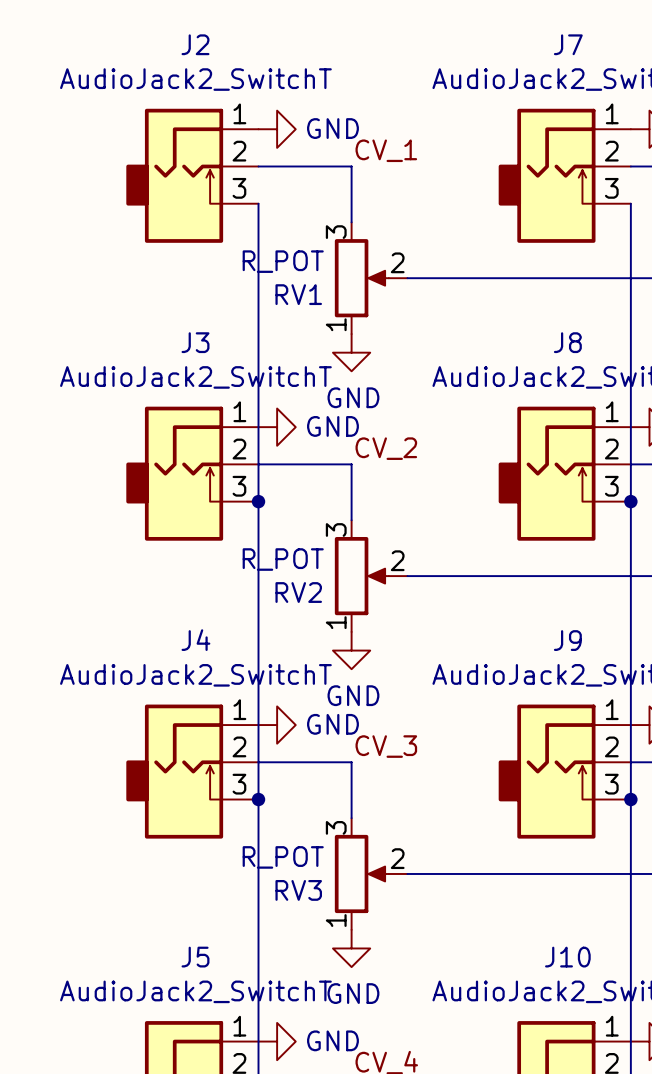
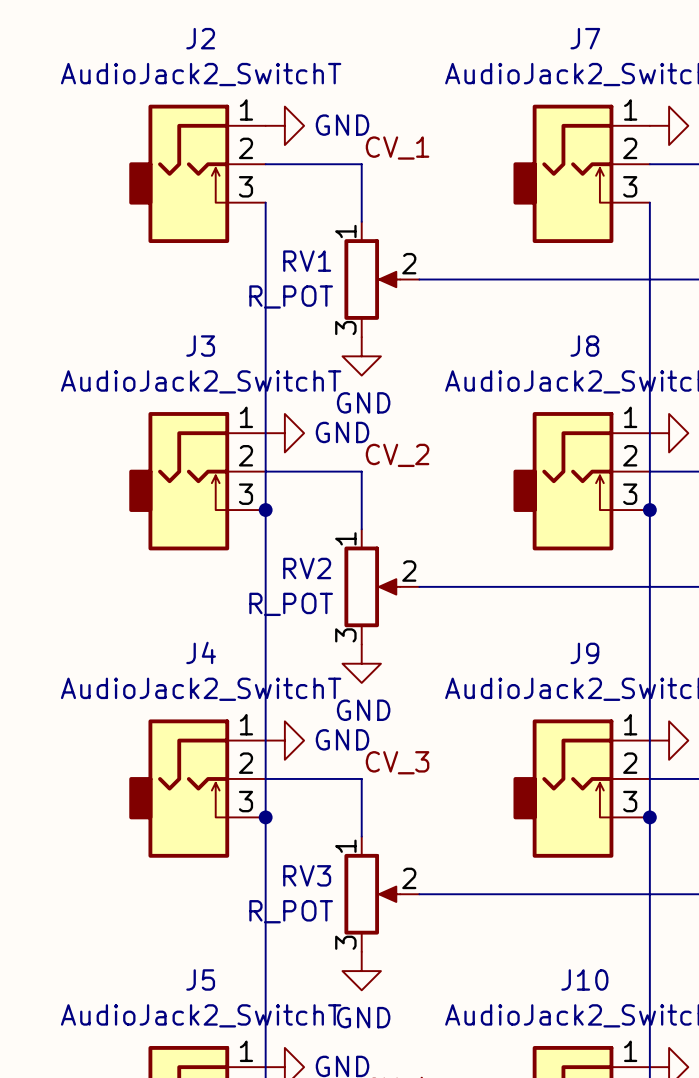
RV1 flip: as is (361, 278) -> up-down (372, 279)
RV2 flip: as is (361, 576) -> up-down (372, 586)
RV3 flip: as is (361, 873) -> up-down (372, 894)

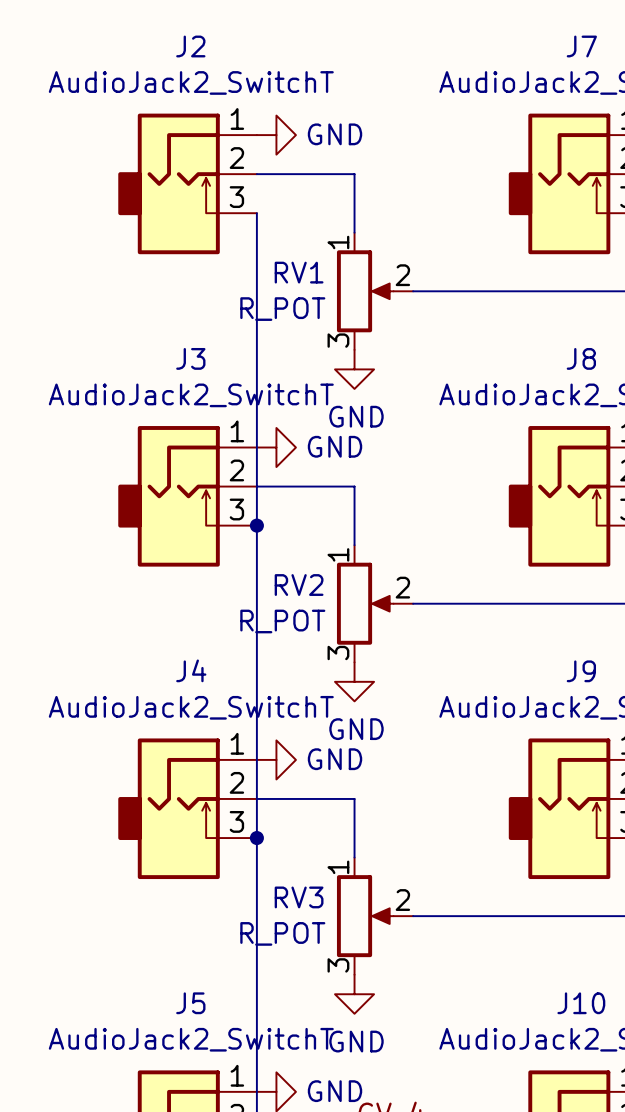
label: CV_1 (397, 148) -> none
label: CV_2 (397, 455) -> none
label: CV_3 (397, 762) -> none

